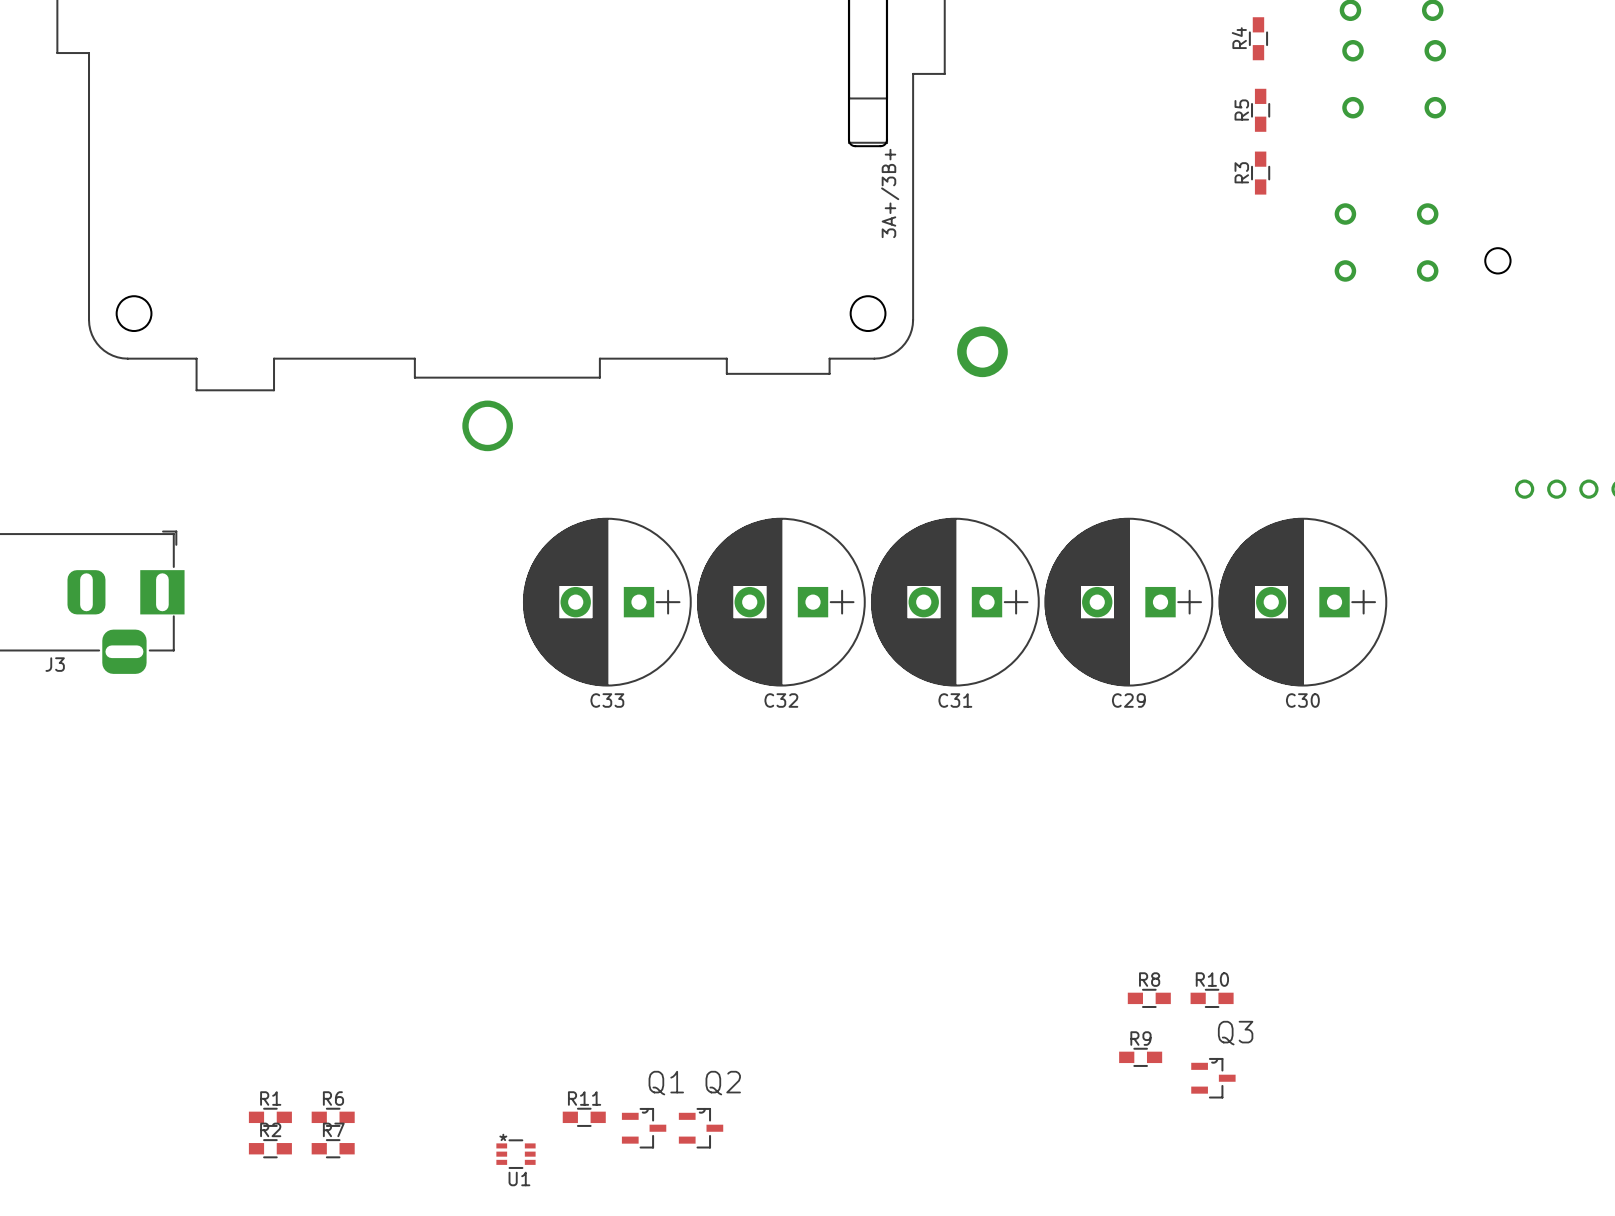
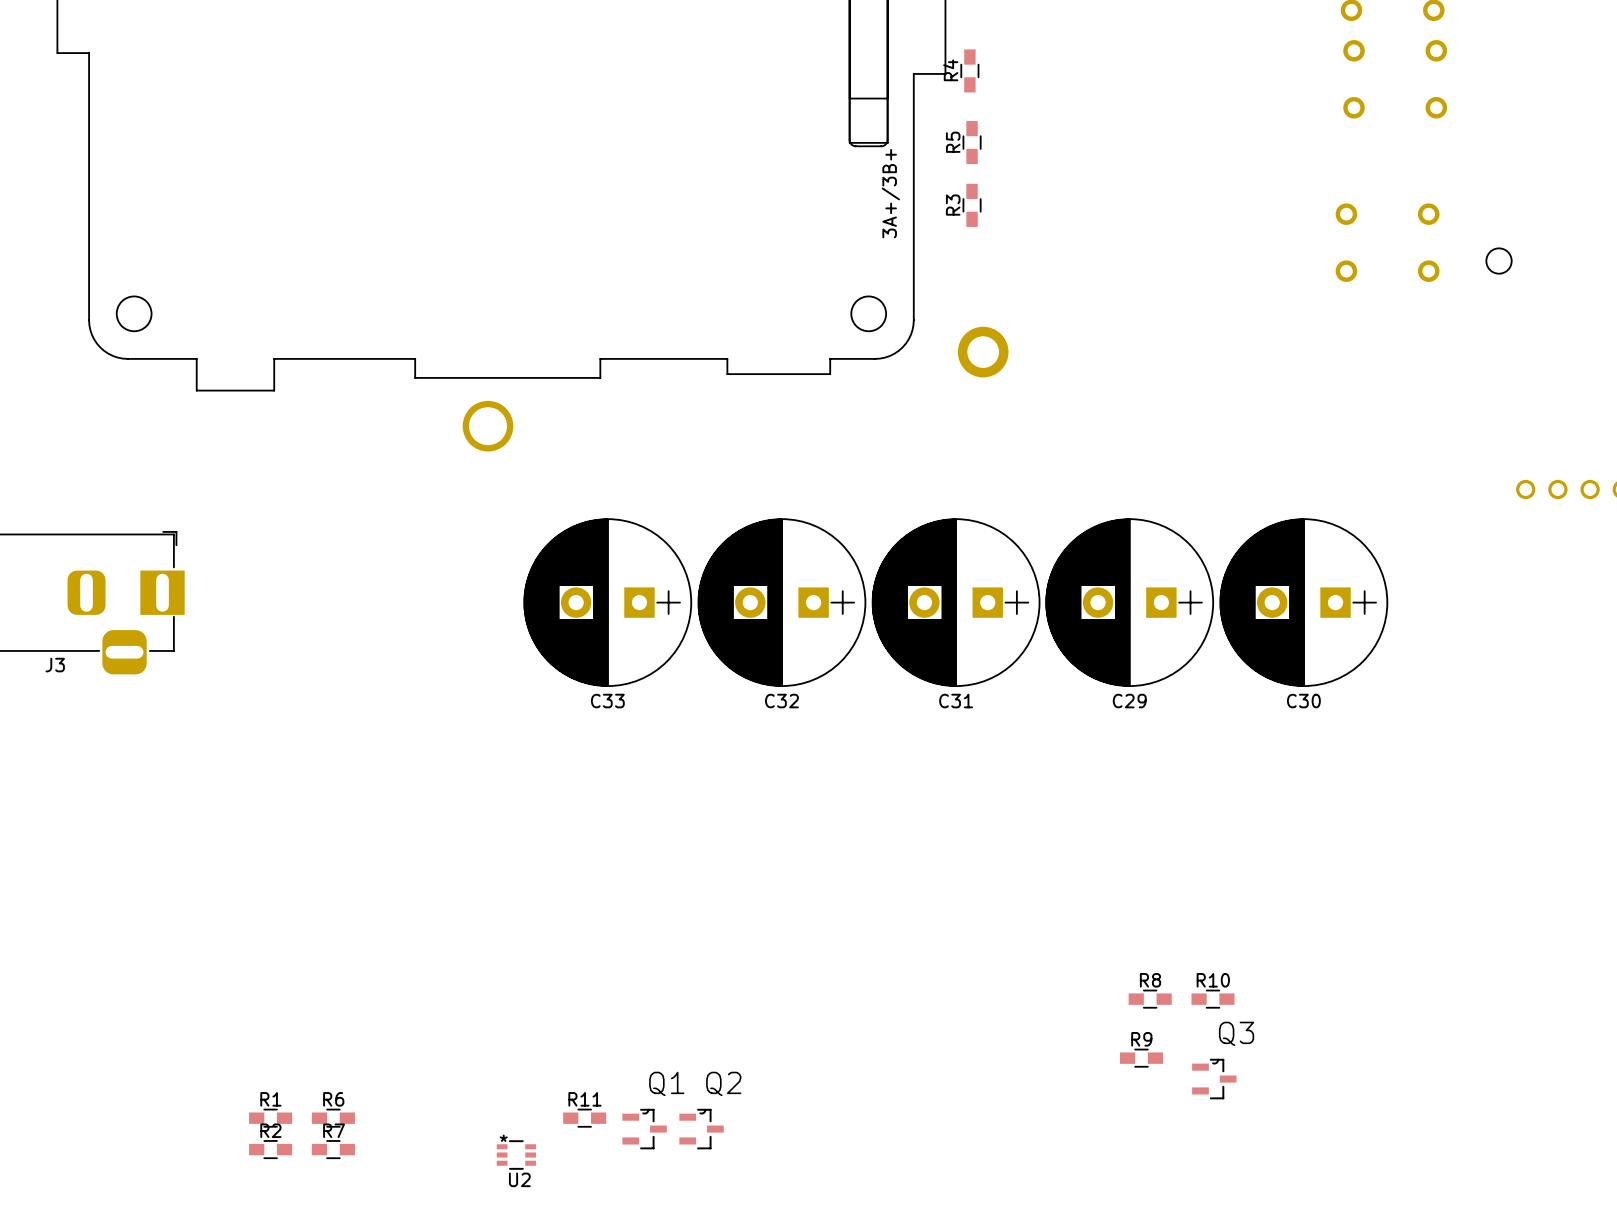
R4 position: (1258, 38) -> (969, 70)
R5 position: (1260, 110) -> (972, 142)
R3 position: (1260, 173) -> (972, 205)
U1 name: U1 (519, 1178) -> U2 (519, 1179)

